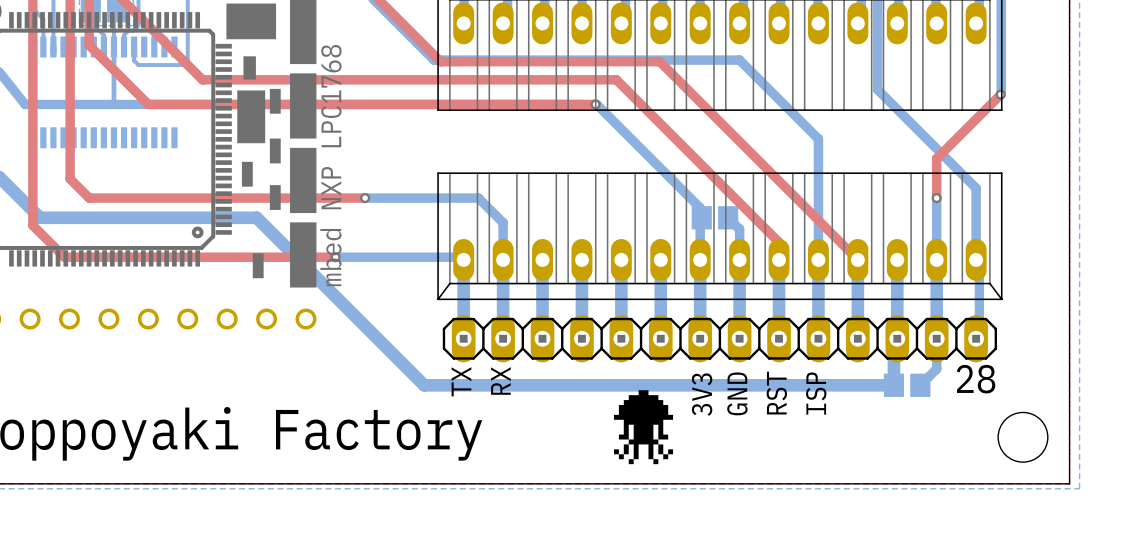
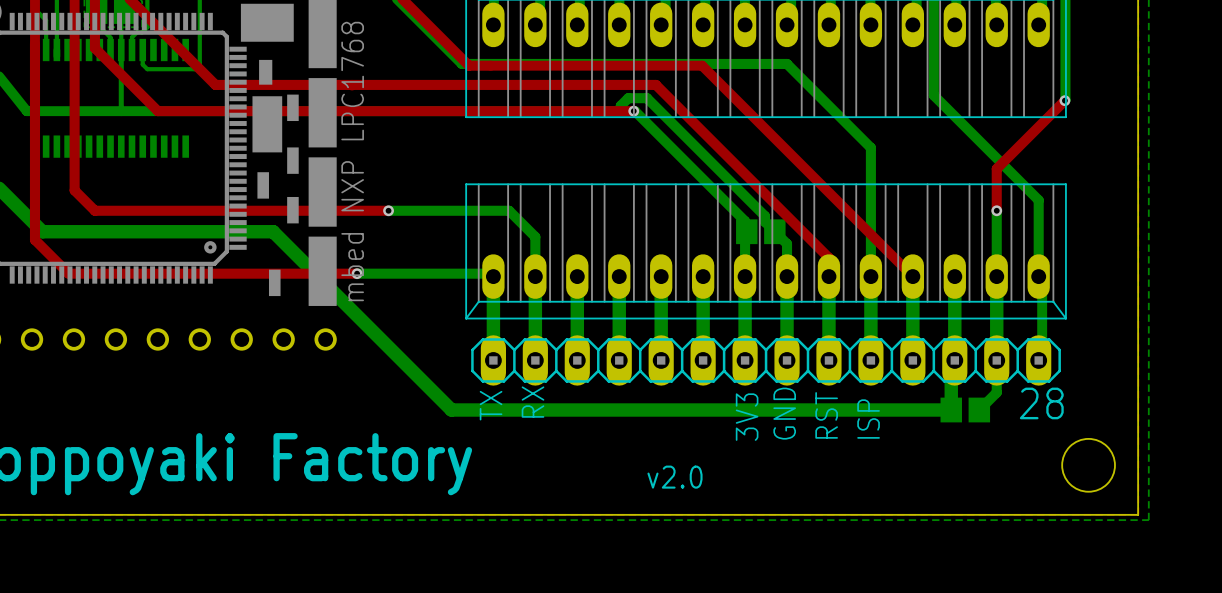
bottom track: none -> (619, 111) (620, 105) (628, 98) (647, 98) (765, 216) (765, 221) (774, 231)
drawing: [613, 390, 674, 465] -> none
text: none -> v2.0 (675, 477)

